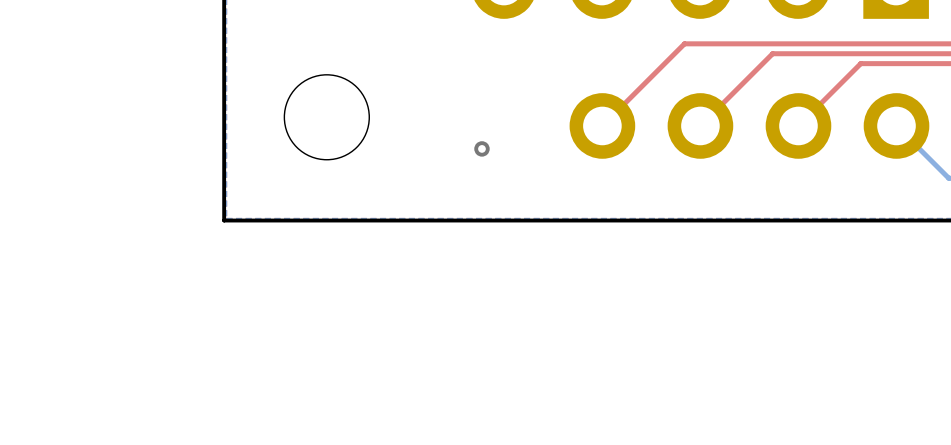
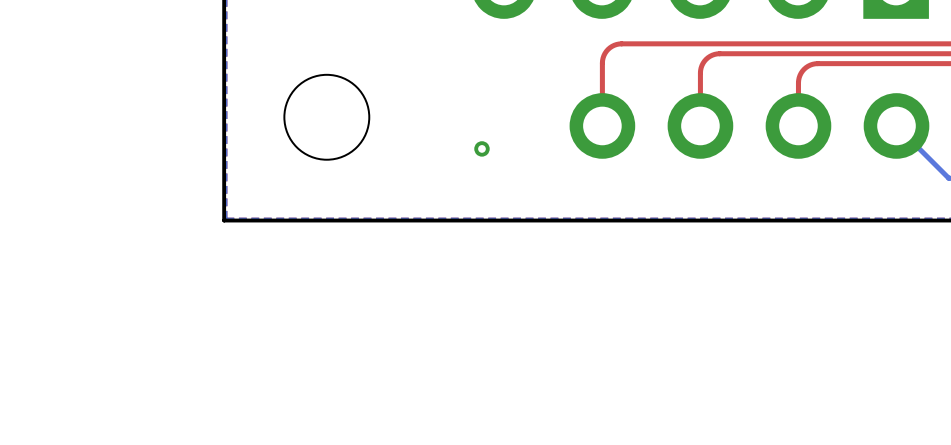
top track: (684, 43) (602, 125) -> (684, 43) (619, 43) (608, 49) (602, 60) (602, 125)
top track: (772, 53) (700, 125) -> (772, 53) (717, 53) (706, 59) (700, 70) (700, 125)
top track: (860, 63) (798, 125) -> (860, 63) (815, 63) (804, 69) (798, 80) (798, 125)

